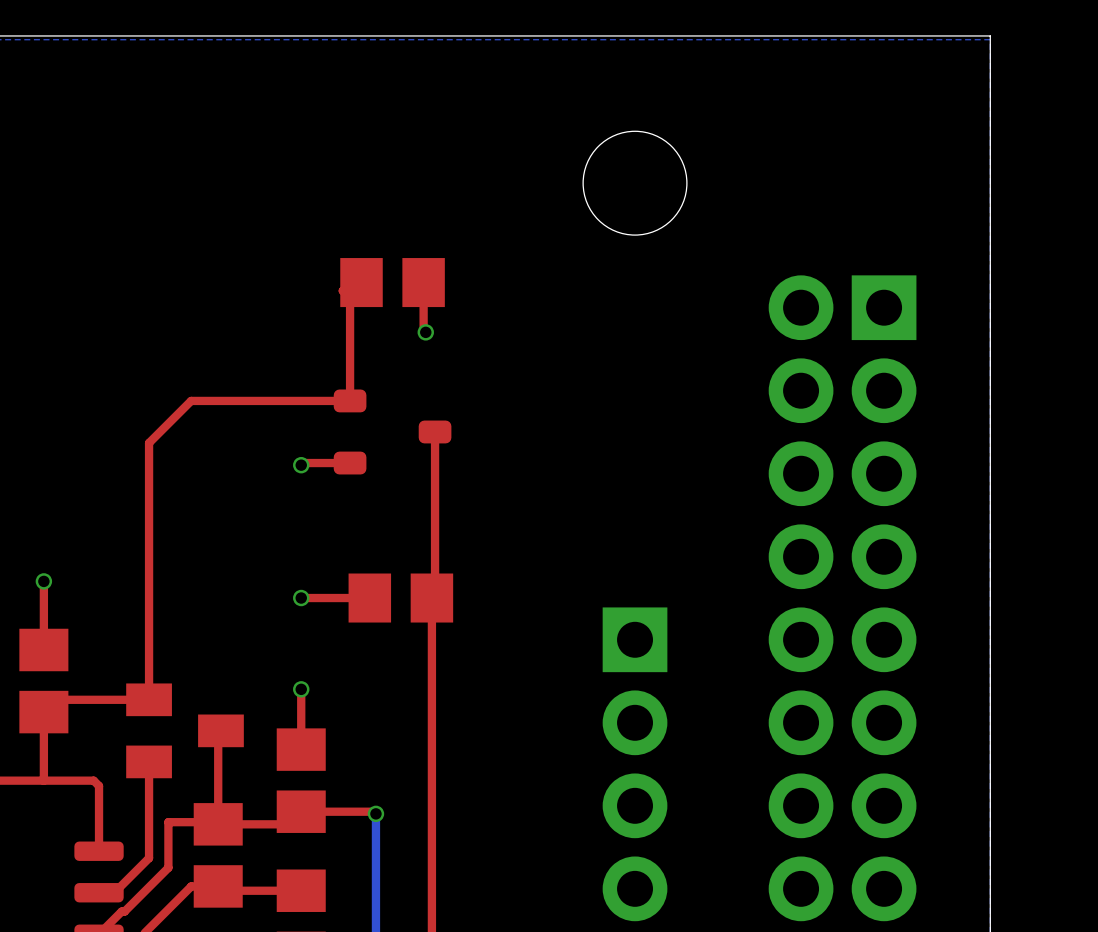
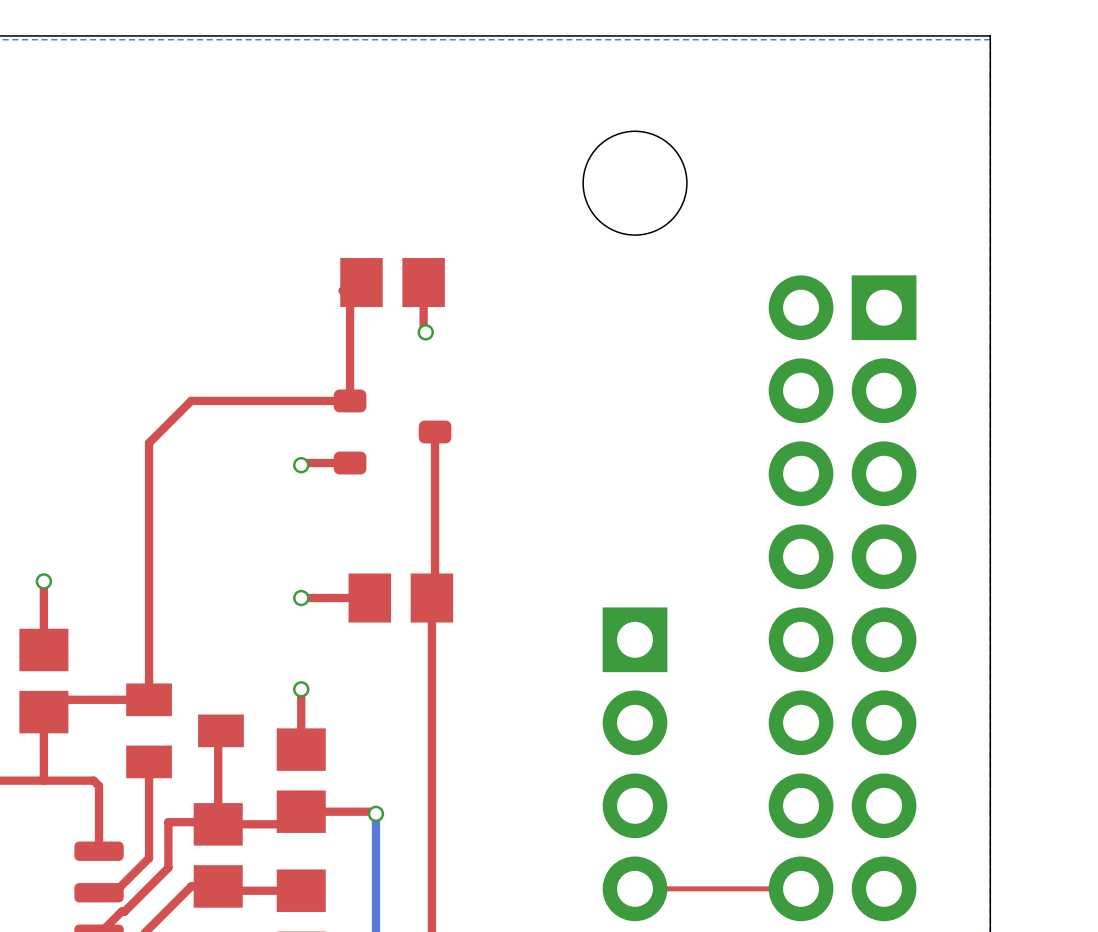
top track: none -> (801, 888) (635, 888)

